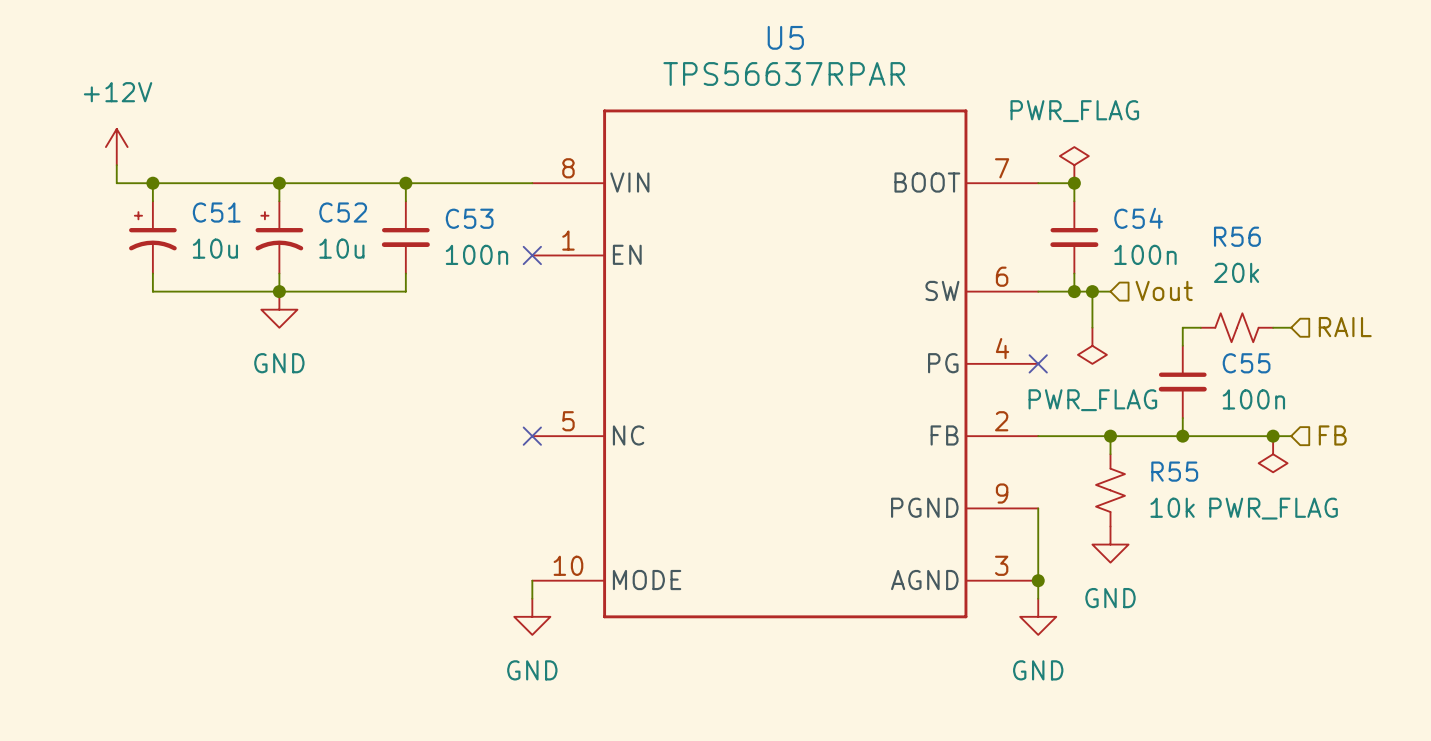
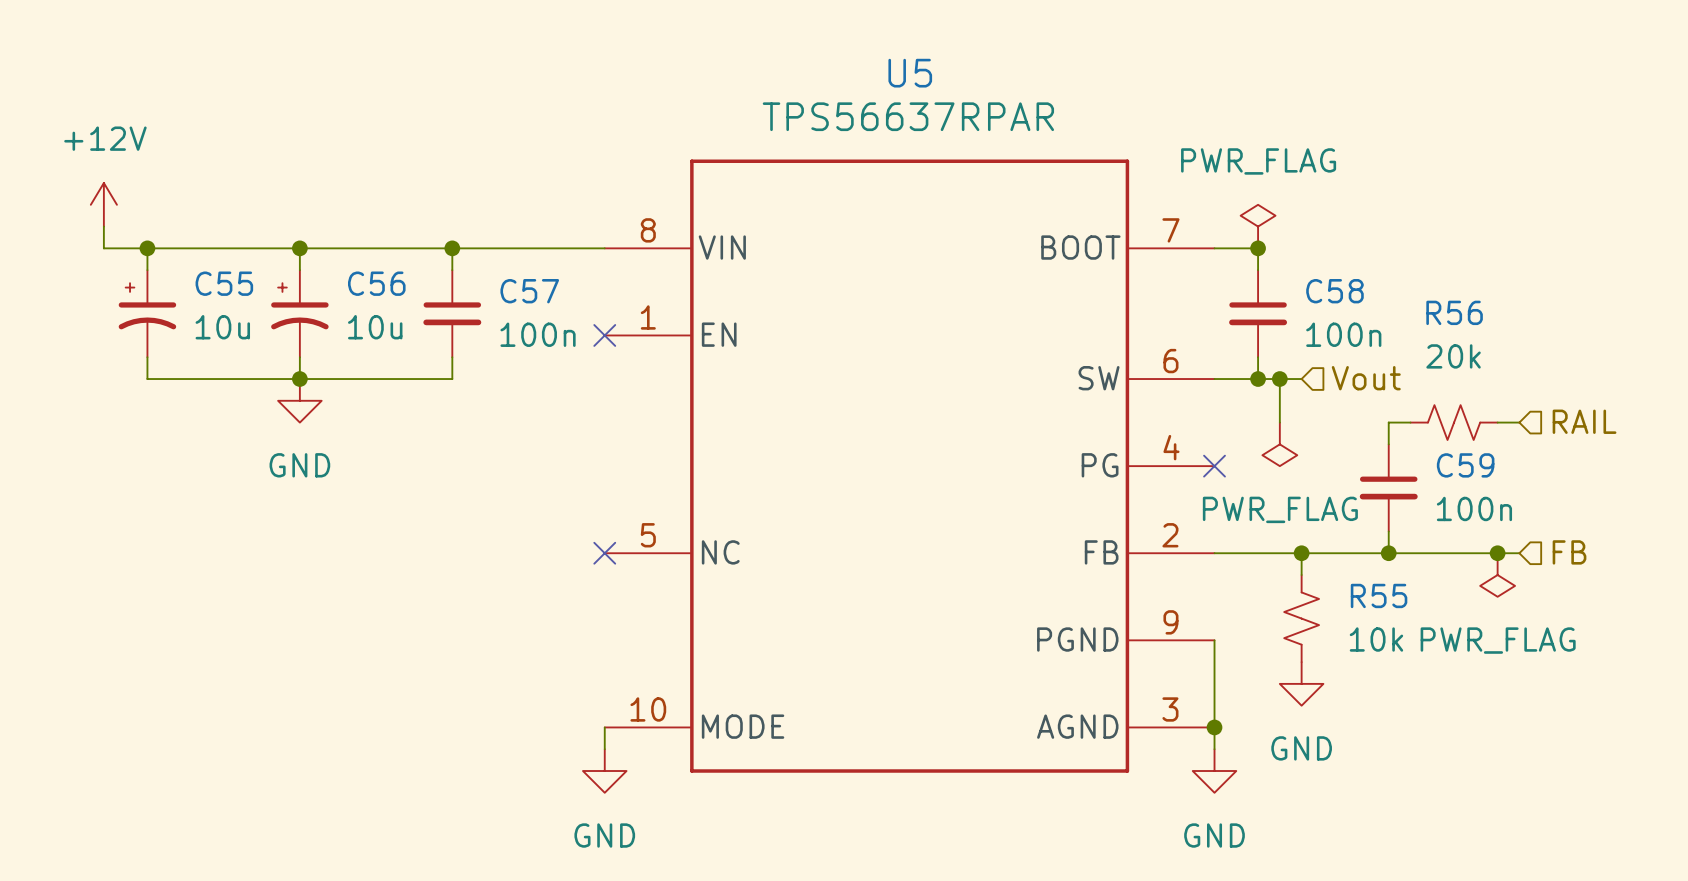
C51 name: C51 (216, 212) -> C55 (224, 283)
C52 name: C52 (343, 212) -> C56 (376, 283)
C53 name: C53 (469, 218) -> C57 (529, 291)
C54 name: C54 (1138, 218) -> C58 (1334, 291)
C55 name: C55 (1246, 363) -> C59 (1465, 465)

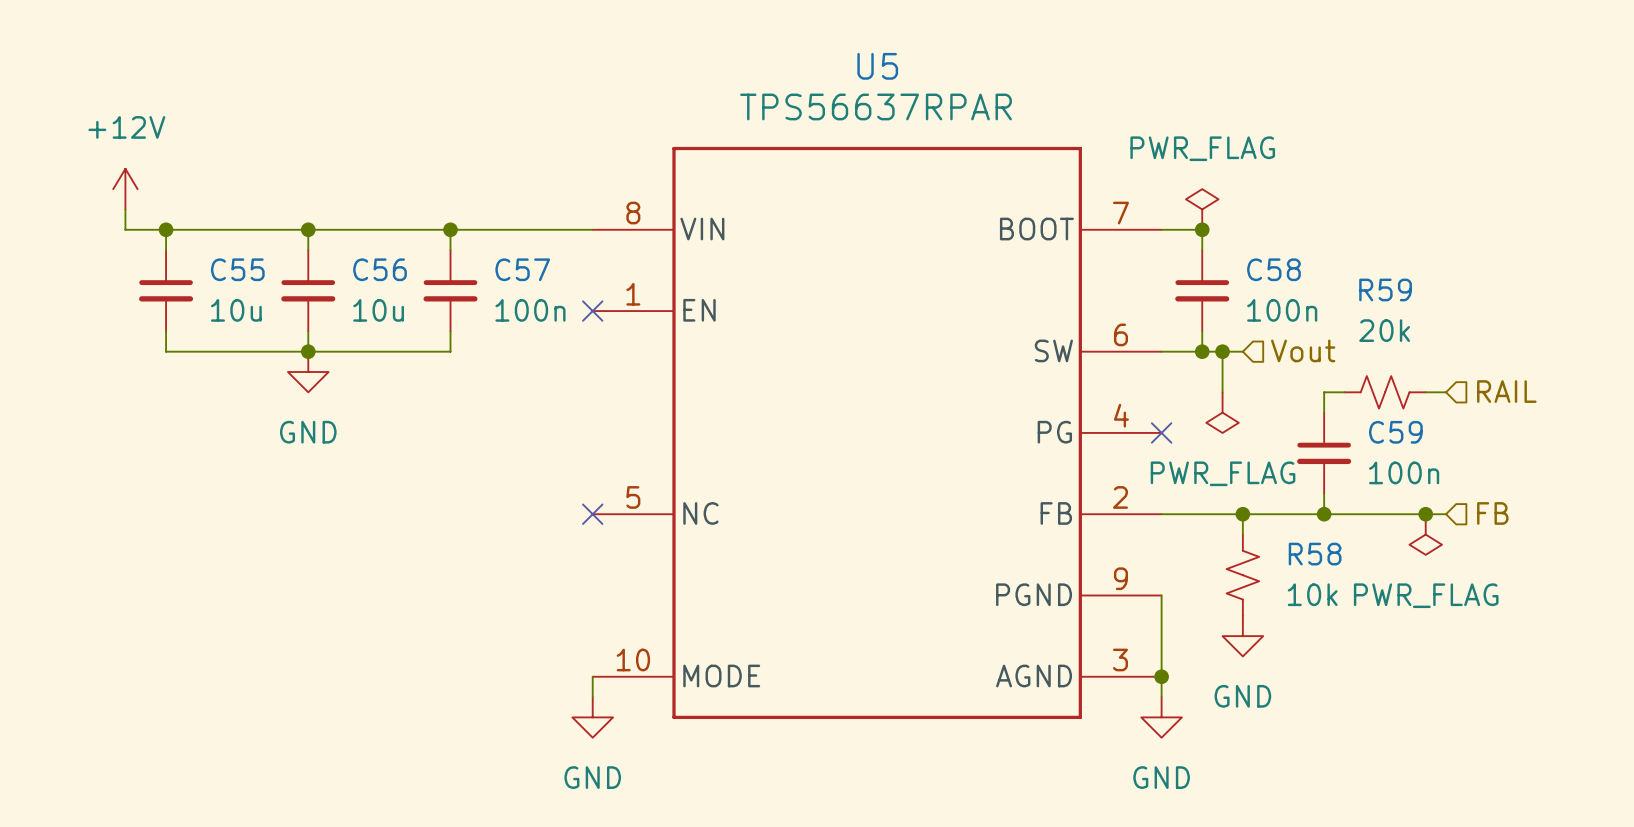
C55 symbol: [118, 270, 177, 358] -> [139, 250, 194, 332]
C56 symbol: [271, 270, 329, 358] -> [281, 250, 336, 332]
R56 name: R56 (1454, 312) -> R59 (1385, 289)
R55 name: R55 (1379, 595) -> R58 (1315, 554)

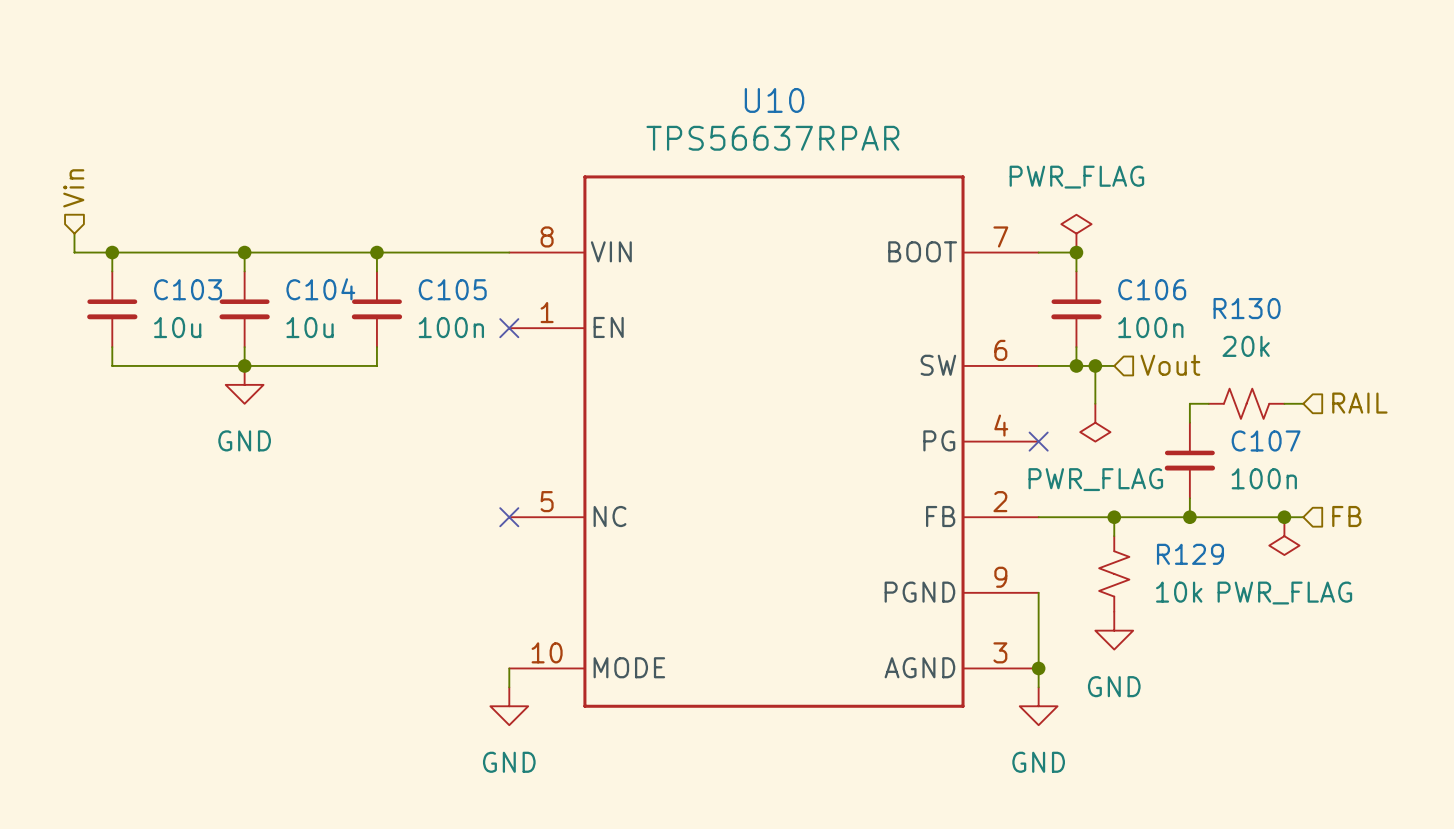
U5 name: U5 (877, 66) -> U10 (774, 100)
hierarchical label: none -> Vin (73, 188)
power symbol: +12V (125, 189) -> none
C55 name: C55 (237, 269) -> C103 (188, 289)
C56 name: C56 (380, 269) -> C104 (320, 289)
C57 name: C57 (522, 269) -> C105 (452, 289)
C58 name: C58 (1273, 269) -> C106 (1152, 289)
R59 name: R59 (1385, 289) -> R130 (1247, 308)
C59 name: C59 (1395, 432) -> C107 (1266, 440)
R58 name: R58 (1315, 554) -> R129 (1190, 554)

